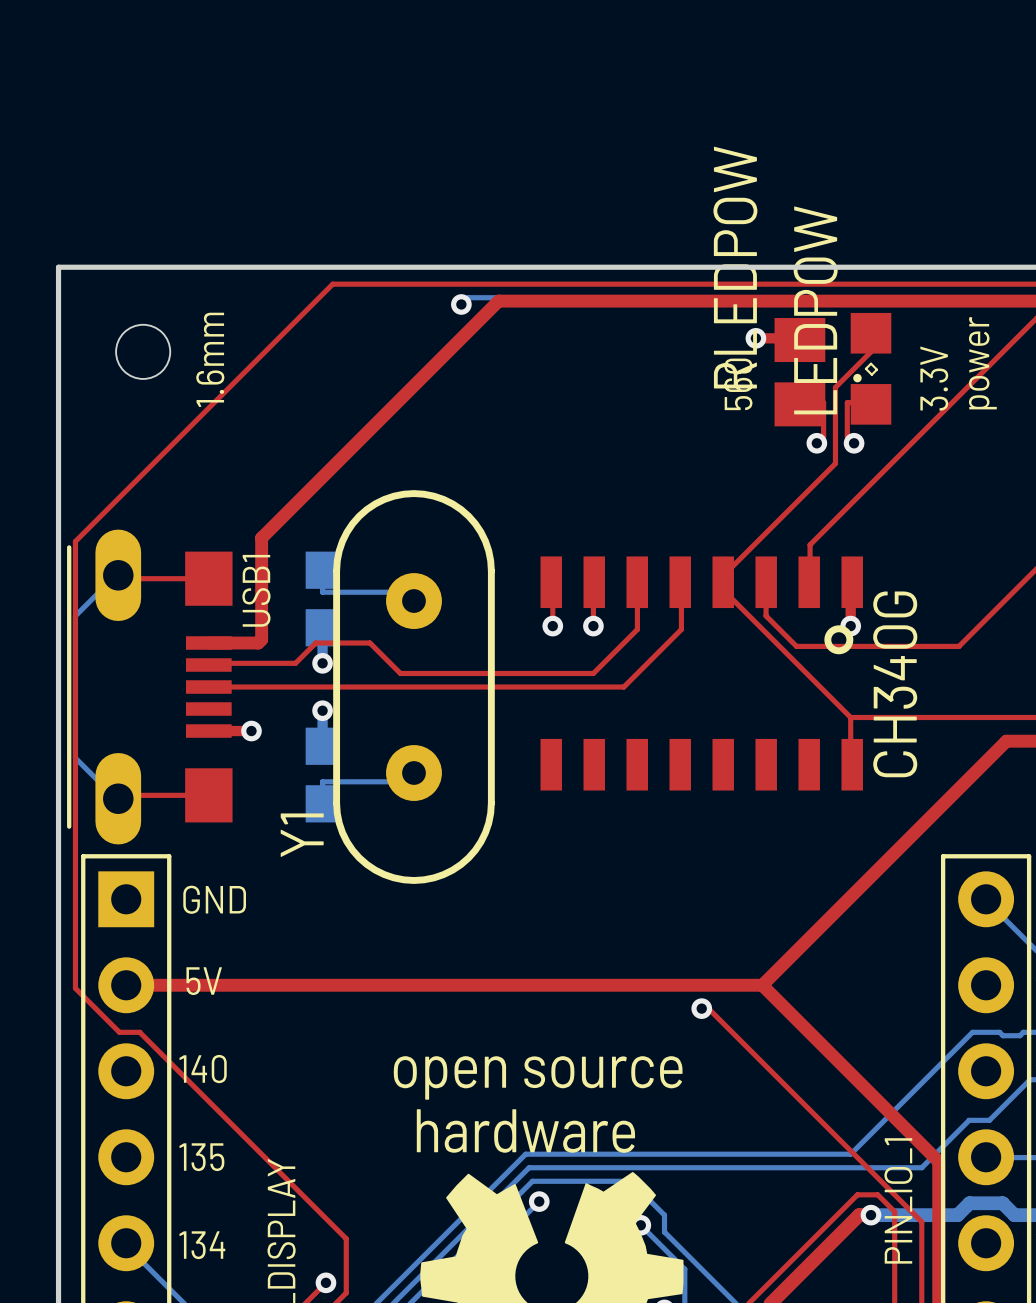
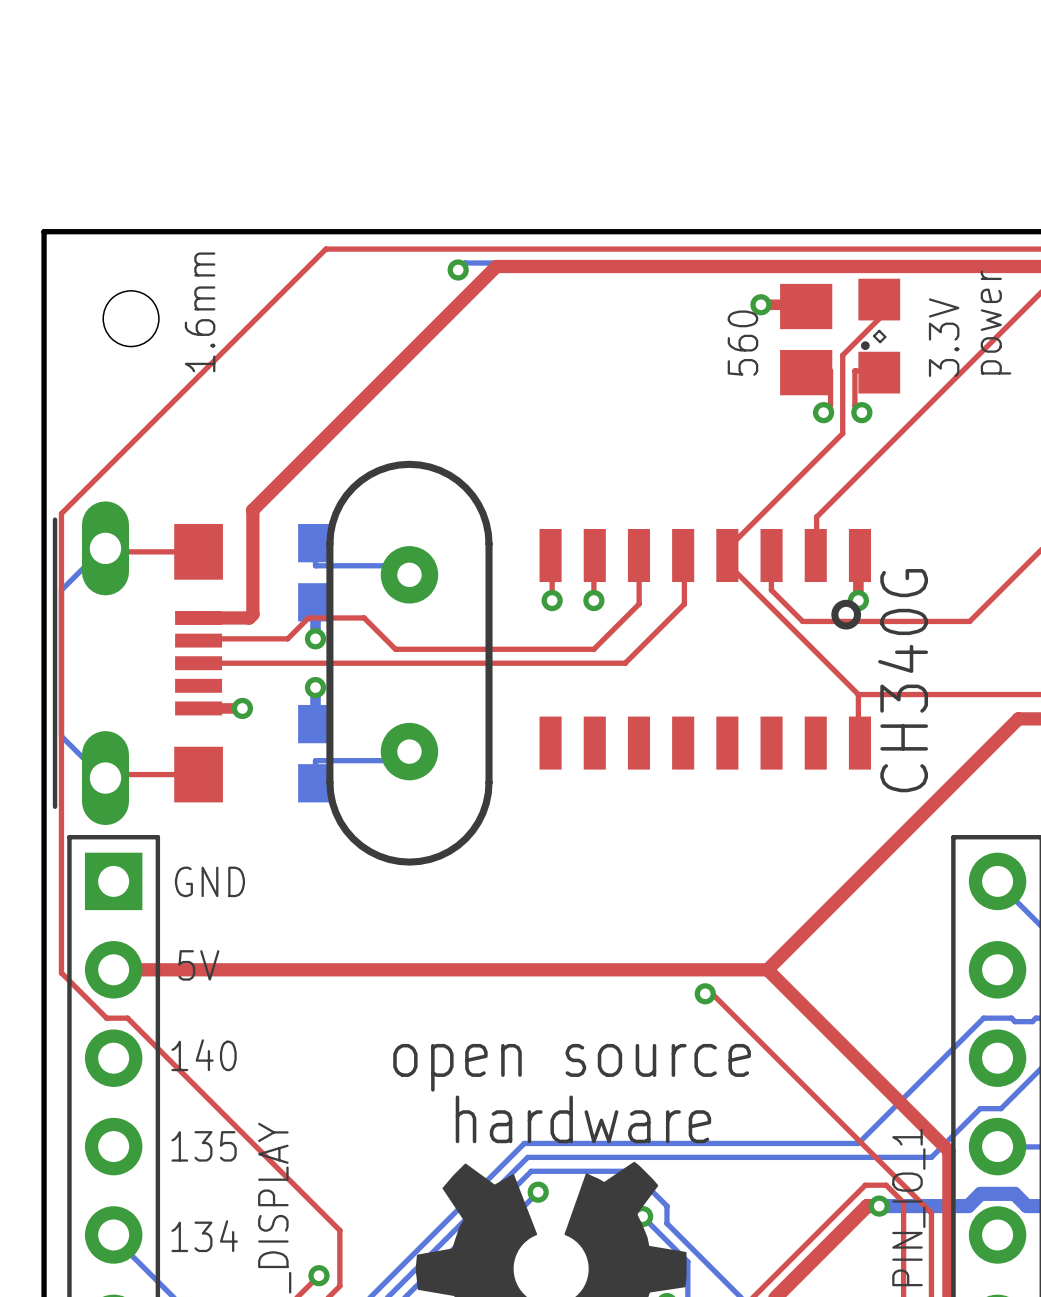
RLEDPOW name: RLEDPOW (735, 267) -> none
LEDPOW name: LEDPOW (815, 310) -> none
USB1 name: USB1 (256, 590) -> none
Y1 name: Y1 (302, 835) -> none

